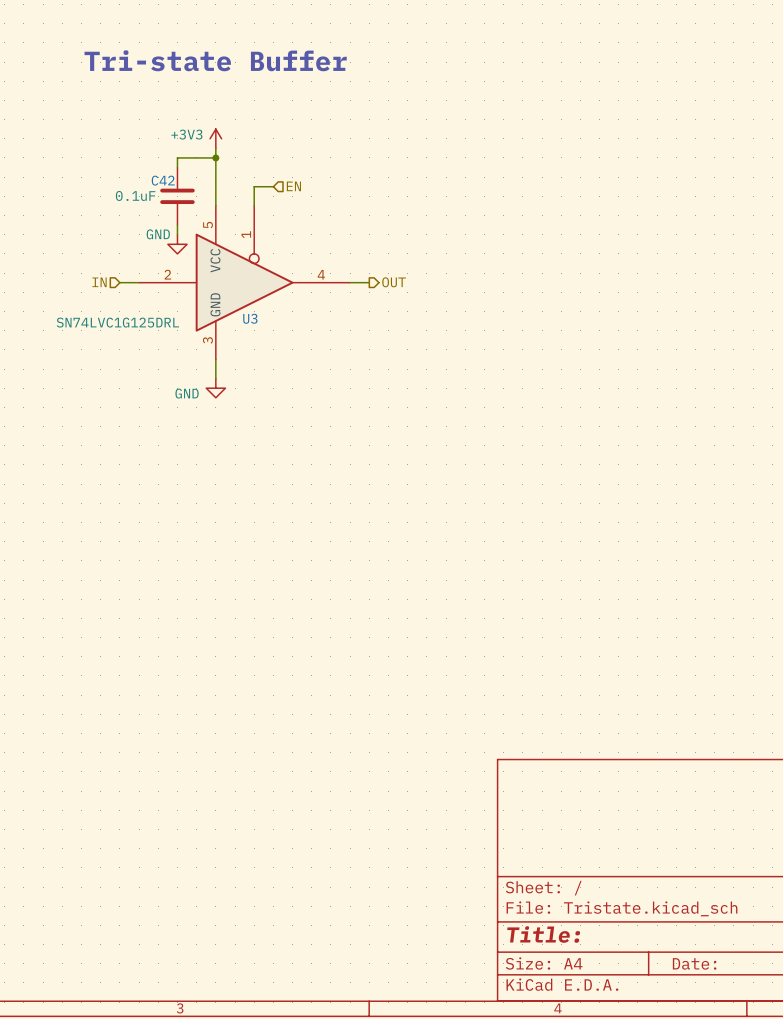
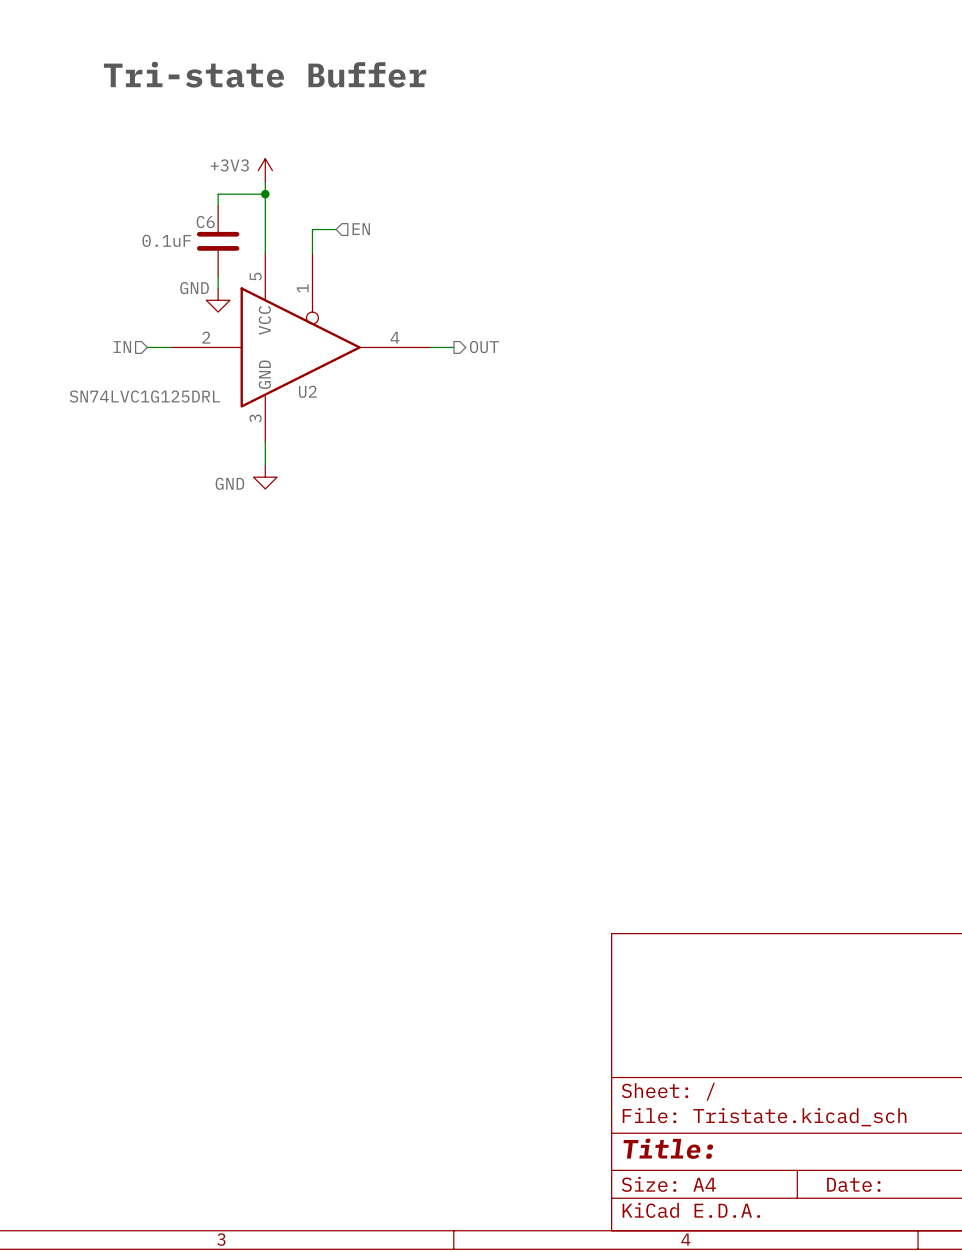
C42 name: C42 (163, 180) -> C6 (205, 222)
U3 name: U3 (250, 318) -> U2 (307, 391)

